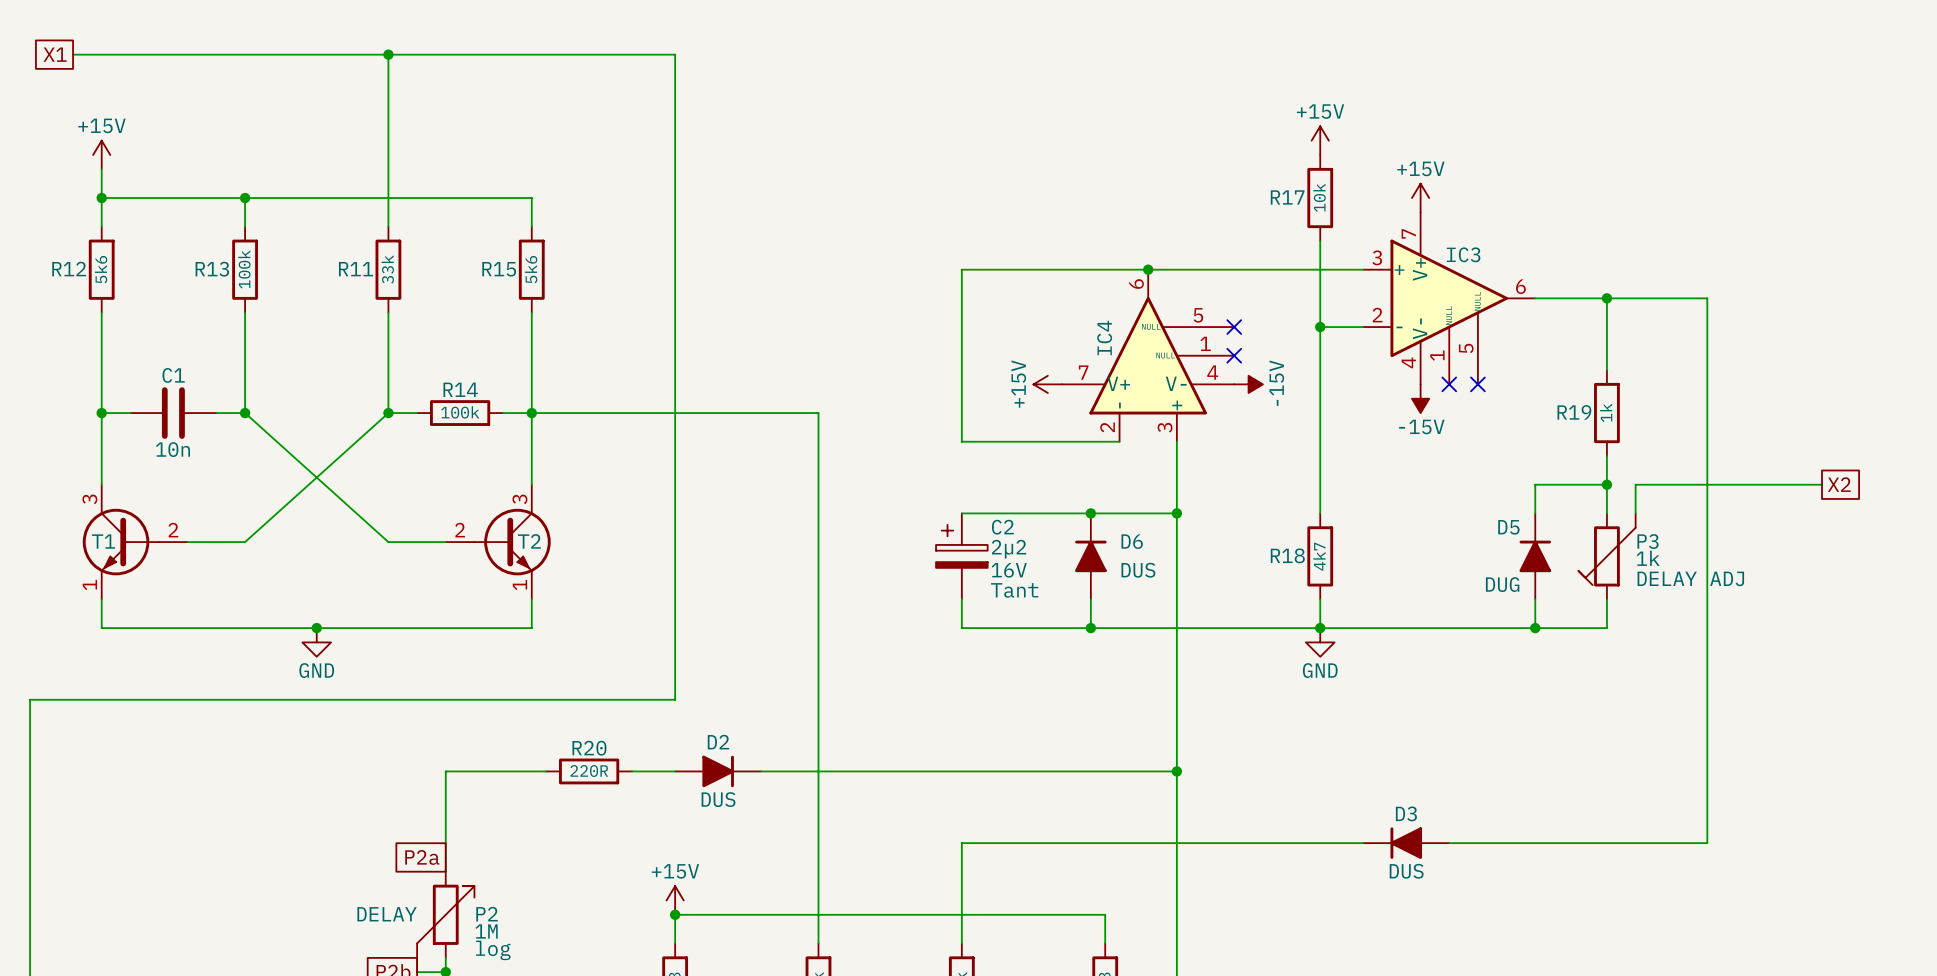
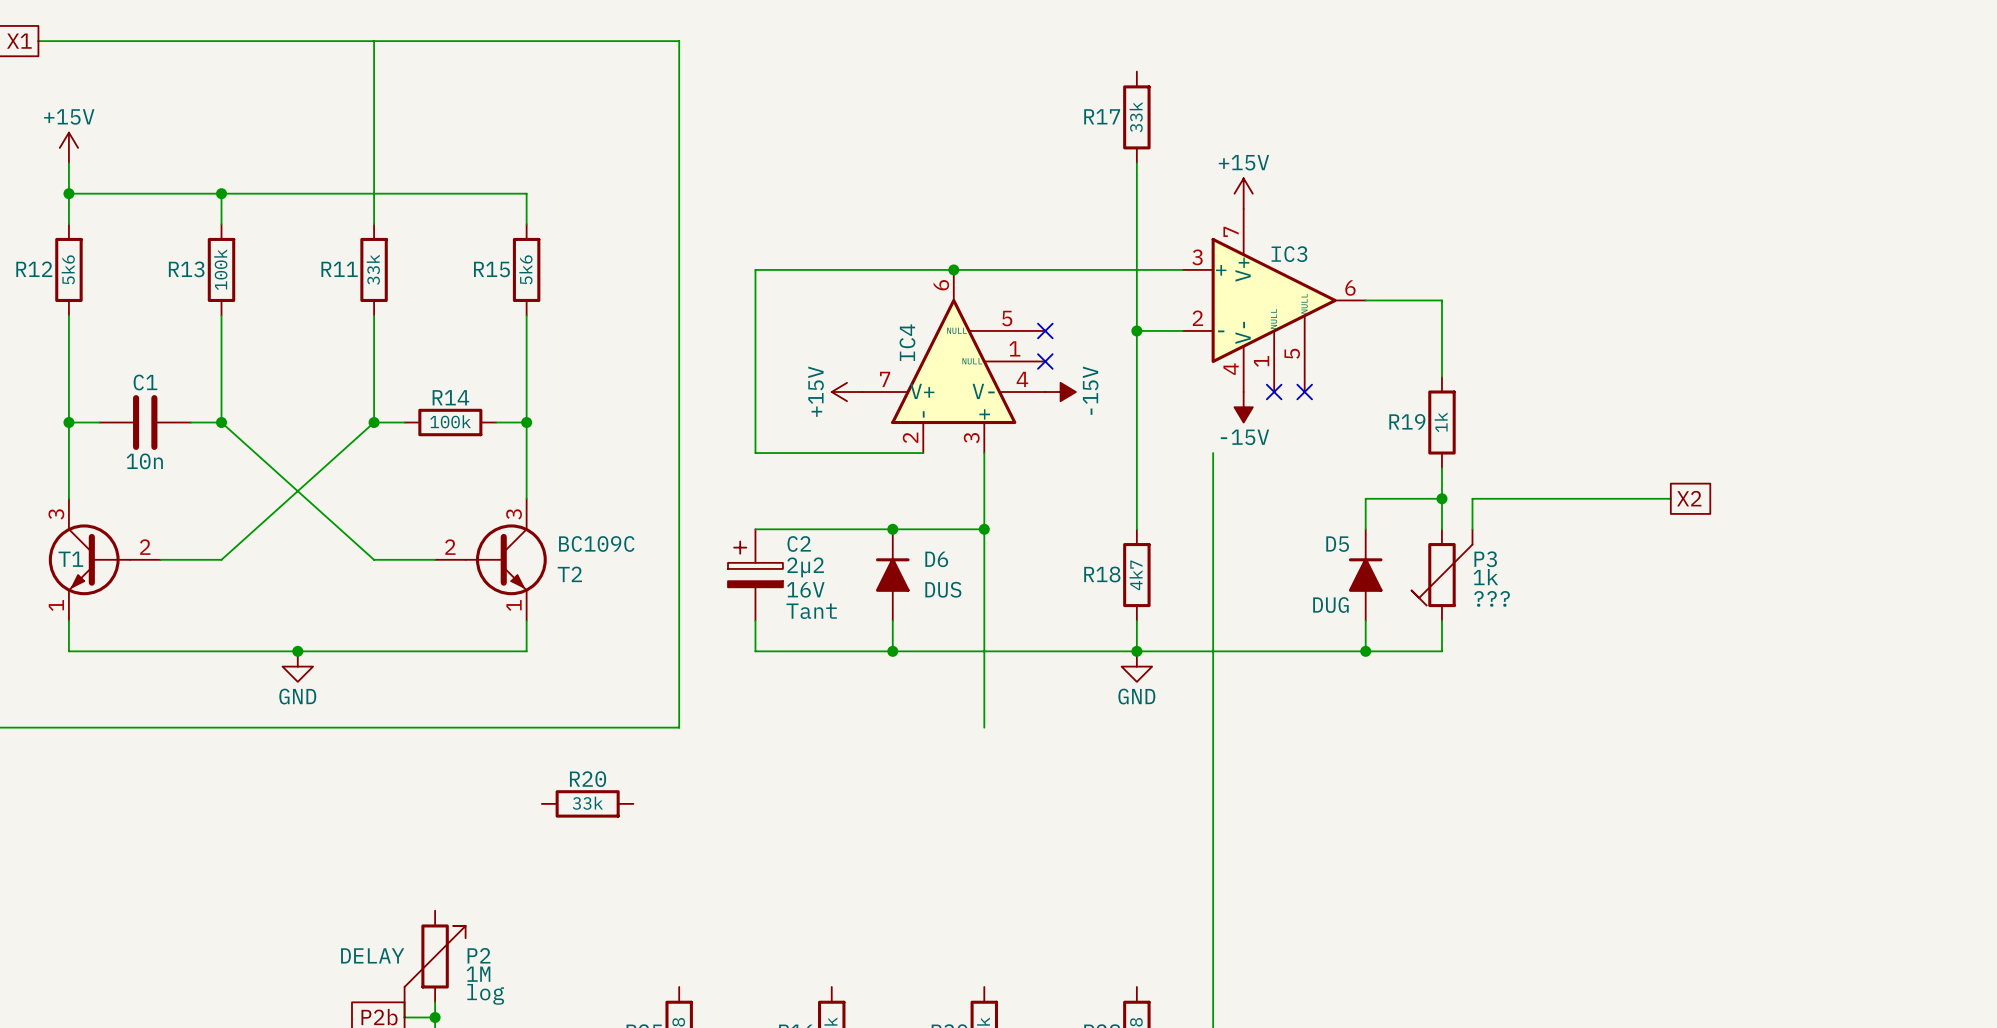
junction: (388, 54) -> none
power symbol: +15V (1320, 140) -> none
wire: none -> (1136, 163) (1136, 529)
R17 value: 10k (1319, 197) -> 33k (1136, 117)
power symbol: none -> +15V (1243, 193)
R17 position: (1320, 198) -> (1136, 117)
power symbol: +15V (1420, 198) -> none
wire: (1320, 241) (1320, 484) -> (1441, 498) (1365, 498)
junction: none -> (953, 269)
wire: (961, 269) (961, 441) (1119, 441) -> (984, 269) (755, 269) (755, 453) (923, 453)
wire: (1148, 269) (1363, 269) -> none
junction: (1148, 269) -> none
wire: none -> (1365, 300) (1441, 300) (1441, 376)
IC3 position: (1449, 298) -> (1274, 300)
wire: (1535, 298) (1707, 298) (1707, 843) (1449, 843) -> none
wire: (1606, 298) (1606, 370) -> none
junction: (1606, 298) -> none
no-connect mark: none -> (1045, 330)
junction: none -> (1136, 330)
no-connect mark: (1234, 327) -> none
wire: (1320, 327) (1363, 327) -> (1136, 330) (1182, 330)
junction: (1320, 327) -> none
no-connect mark: none -> (1045, 361)
IC4 position: (1148, 355) -> (953, 361)
no-connect mark: (1234, 355) -> none
power symbol: none -> +15V (847, 392)
power symbol: none -> -15V (1060, 392)
power symbol: +15V (1047, 384) -> none
no-connect mark: none -> (1274, 392)
power symbol rotation: 0° (1248, 384) -> 90° clockwise (1243, 407)
power symbol position: -15V (1248, 384) -> -15V (1243, 407)
no-connect mark: none -> (1304, 392)
no-connect mark: (1449, 384) -> none
no-connect mark: (1477, 384) -> none
power symbol: -15V (1420, 398) -> none
wire: (531, 413) (818, 413) (818, 943) -> none
R19 position: (1606, 413) -> (1441, 422)
wire: none -> (984, 453) (984, 620)
wire: (1606, 456) (1606, 513) -> (1441, 468) (1441, 529)
junction: none -> (1441, 498)
wire: (1535, 484) (1535, 513) -> (1594, 498) (1472, 498) (1472, 529)
junction: (1606, 484) -> none
wire: (1821, 484) (1635, 484) (1635, 513) -> none
global label position: X2 (1839, 484) -> X2 (1689, 498)
junction: none -> (892, 529)
wire: (961, 513) (1176, 513) -> (984, 529) (755, 529)
junction: none -> (984, 529)
junction: (1090, 513) -> none
junction: (1176, 513) -> none
T2 value: none -> BC109C (596, 543)
T2 name position: T2 (529, 541) -> T2 (569, 574)
C2 position: (961, 556) -> (755, 575)
D6 position: (1090, 556) -> (892, 575)
R18 position: (1320, 556) -> (1136, 575)
D5 position: (1535, 556) -> (1365, 575)
P3 position: (1606, 556) -> (1441, 575)
P3 text: DELAY ADJ (1690, 578) -> ??? (1492, 598)
wire: none -> (755, 620) (755, 651) (984, 651) (984, 727)
wire: (1090, 599) (1090, 628) -> (892, 620) (892, 651)
wire: none -> (1136, 620) (1136, 651)
wire: (1535, 599) (1535, 628) -> none
wire: (1606, 599) (1606, 628) (1391, 628) -> (1441, 620) (1441, 651)
junction: none -> (892, 651)
junction position: (1090, 628) -> (1136, 651)
junction: (1535, 628) -> none
power symbol position: GND (1320, 642) -> GND (1136, 666)
wire: (546, 771) (445, 771) (445, 871) -> none
R20 value: 220R (589, 771) -> 33k (587, 803)
wire: (632, 771) (675, 771) -> none
D2: DUS (718, 771) -> none
wire: (761, 771) (1176, 771) -> none
junction: (1176, 771) -> none
wire: (1363, 843) (961, 843) (961, 943) -> none
D3: DUS (1406, 843) -> none
global label: P2a (422, 857) -> none
power symbol: +15V (675, 900) -> none
junction: (675, 914) -> none
wire: (675, 943) (675, 914) (1105, 914) (1105, 943) -> none

